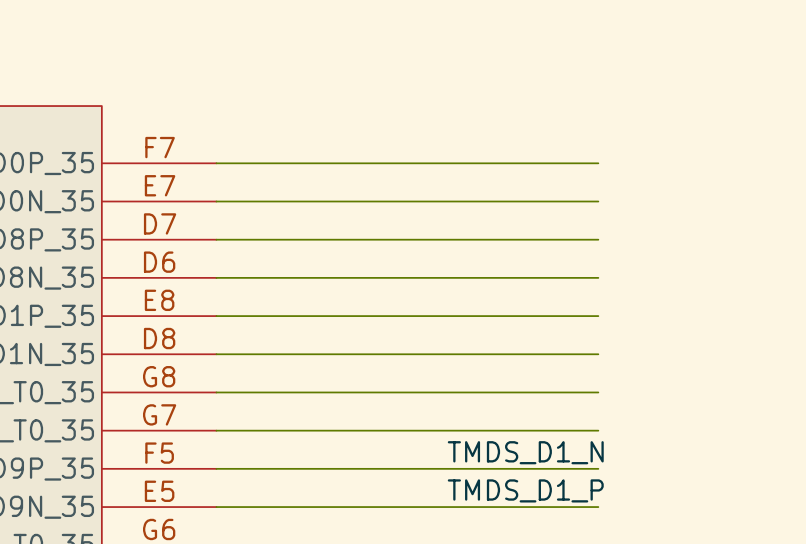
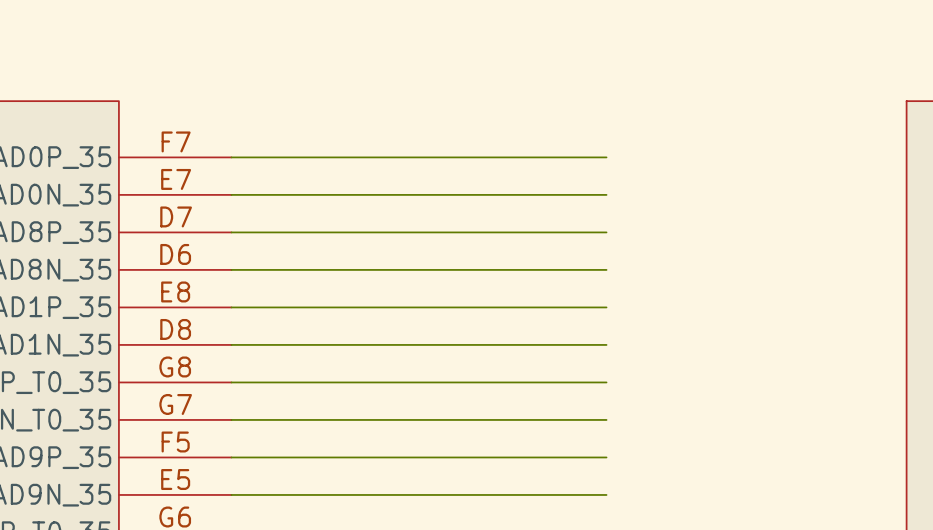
label: TMDS_D1_N (525, 452) -> none
label: TMDS_D1_P (525, 490) -> none

